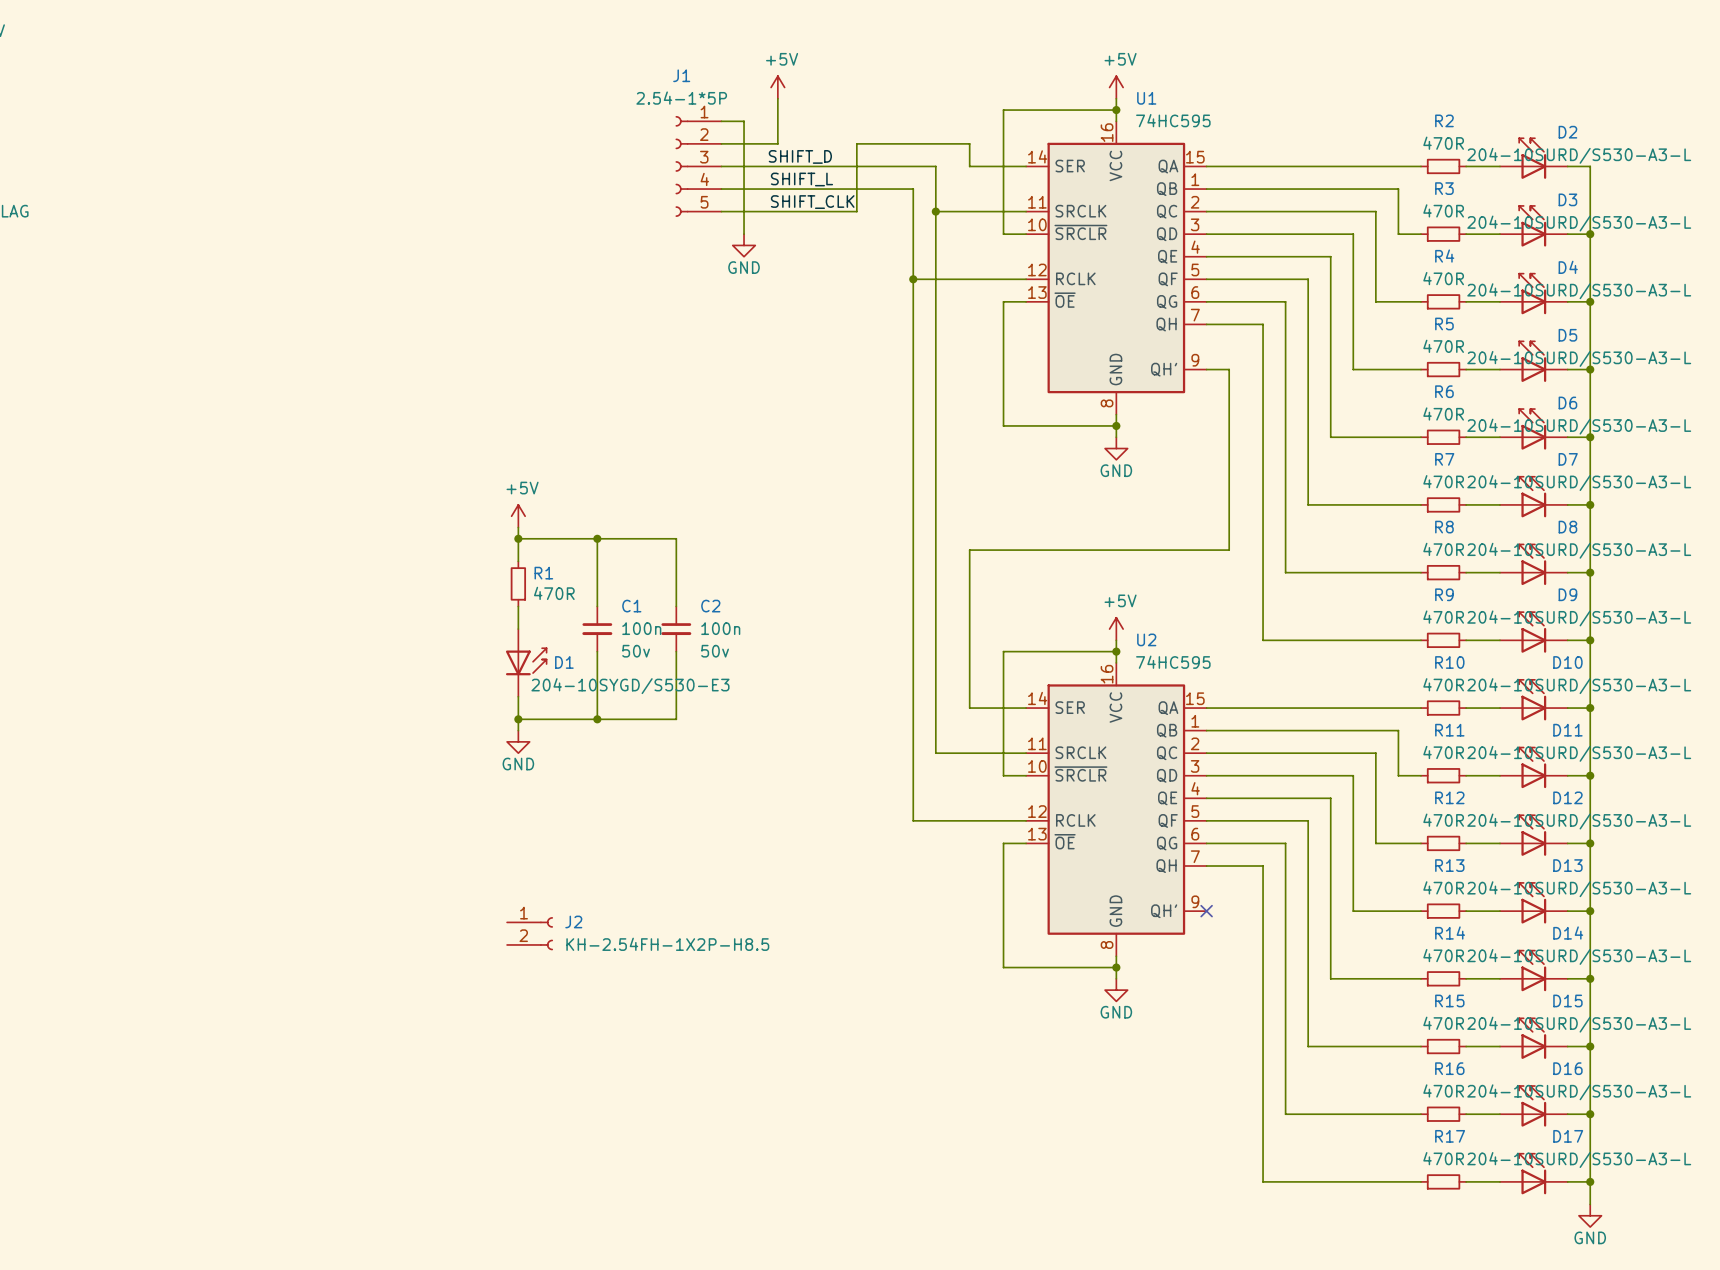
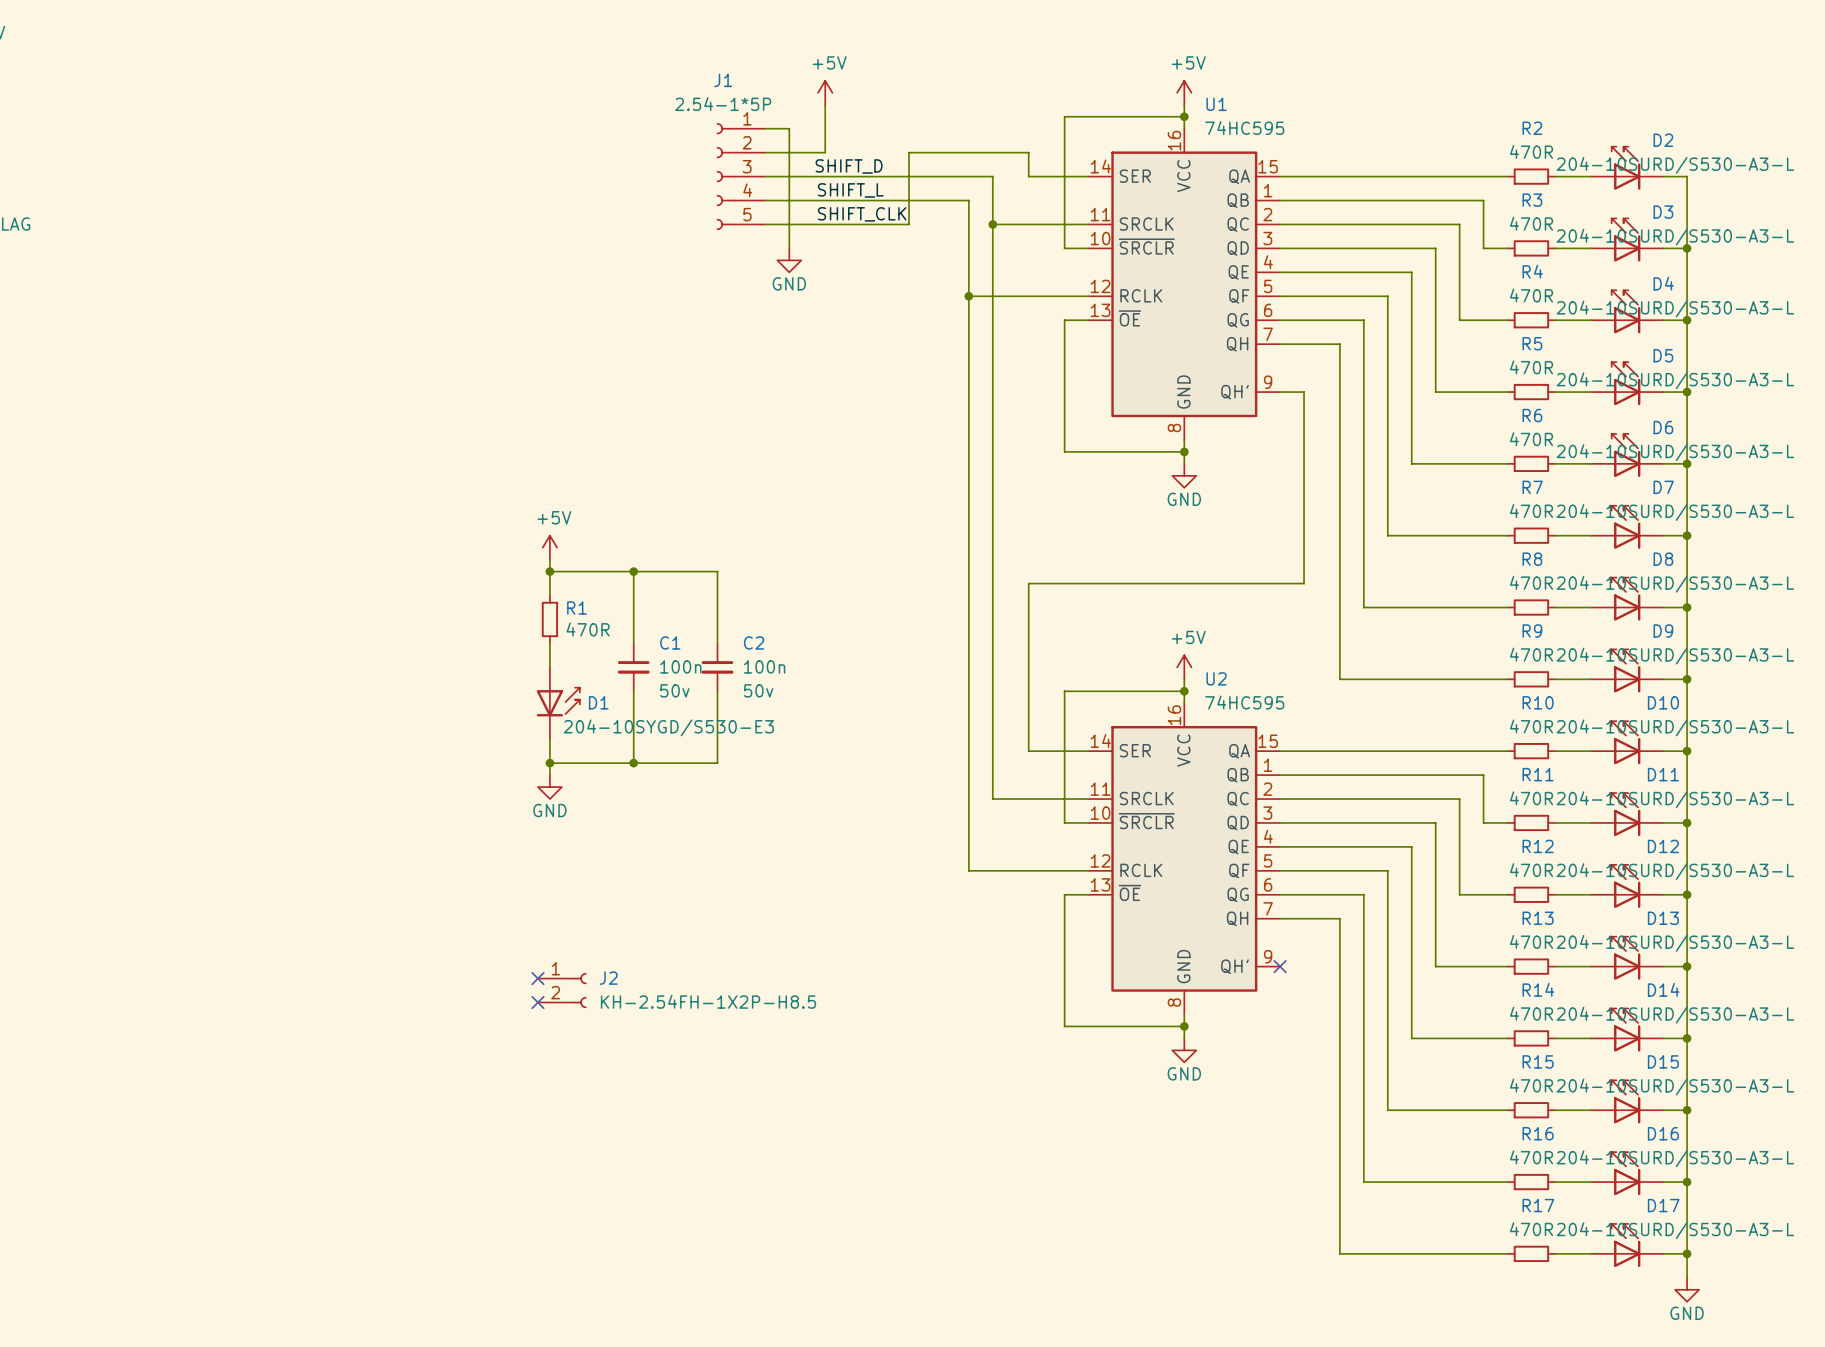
no-connect mark: none -> (537, 978)
no-connect mark: none -> (537, 1002)

